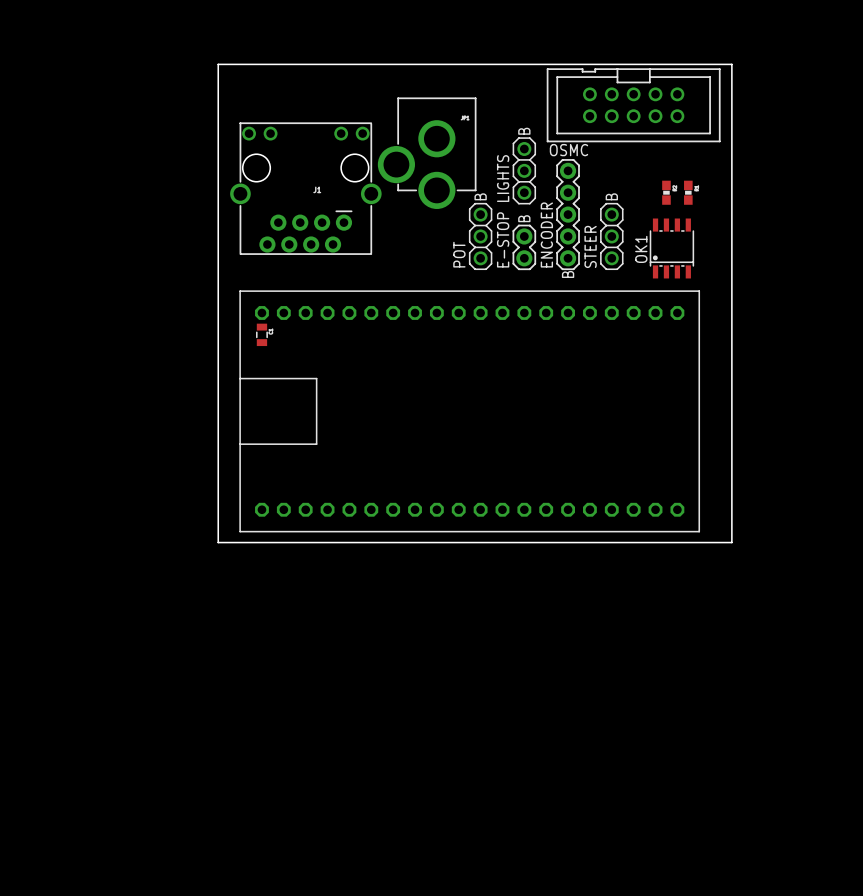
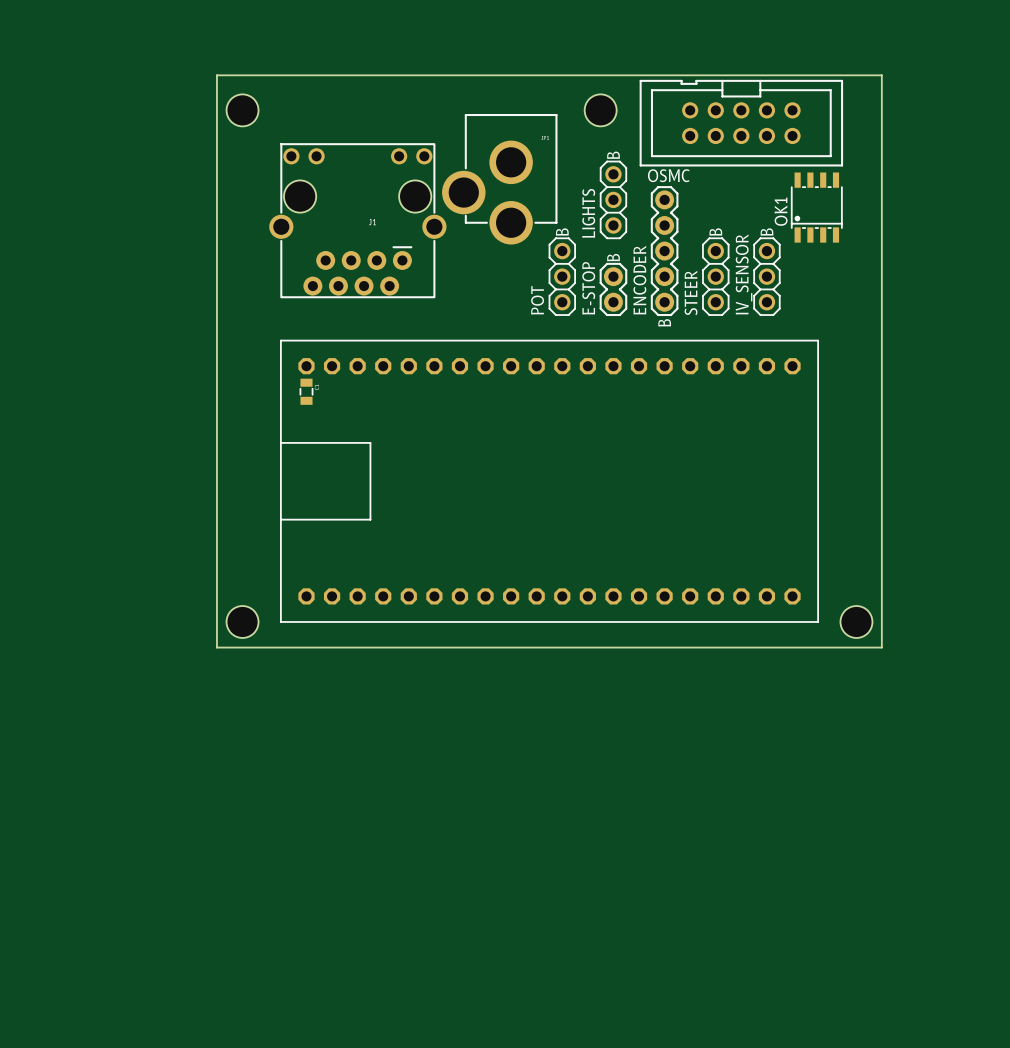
board edge: (218, 64) (218, 542) (731, 542) (731, 64) -> (255, 75) (216, 75) (216, 647) (881, 647) (881, 75) (856, 75)
hole: none -> (242, 110)
hole: none -> (600, 110)
part: (666, 192) -> none
part: (688, 192) -> none
text: none -> B (766, 232)
IV_SENSOR: none -> (766, 276)
OK1 position: (671, 248) -> (816, 207)
hole: none -> (242, 621)
hole: none -> (856, 621)

